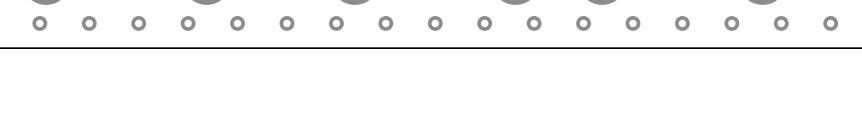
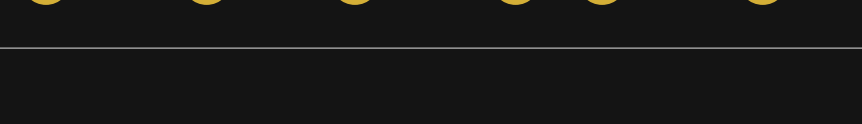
via: (39, 23) -> none
via: (89, 23) -> none
via: (138, 23) -> none
via: (188, 23) -> none
via: (237, 23) -> none
via: (286, 23) -> none
via: (336, 23) -> none
via: (385, 23) -> none
via: (435, 23) -> none
via: (484, 23) -> none
via: (534, 23) -> none
via: (583, 23) -> none
via: (632, 23) -> none
via: (682, 23) -> none
via: (731, 23) -> none
via: (781, 23) -> none
via: (830, 23) -> none

